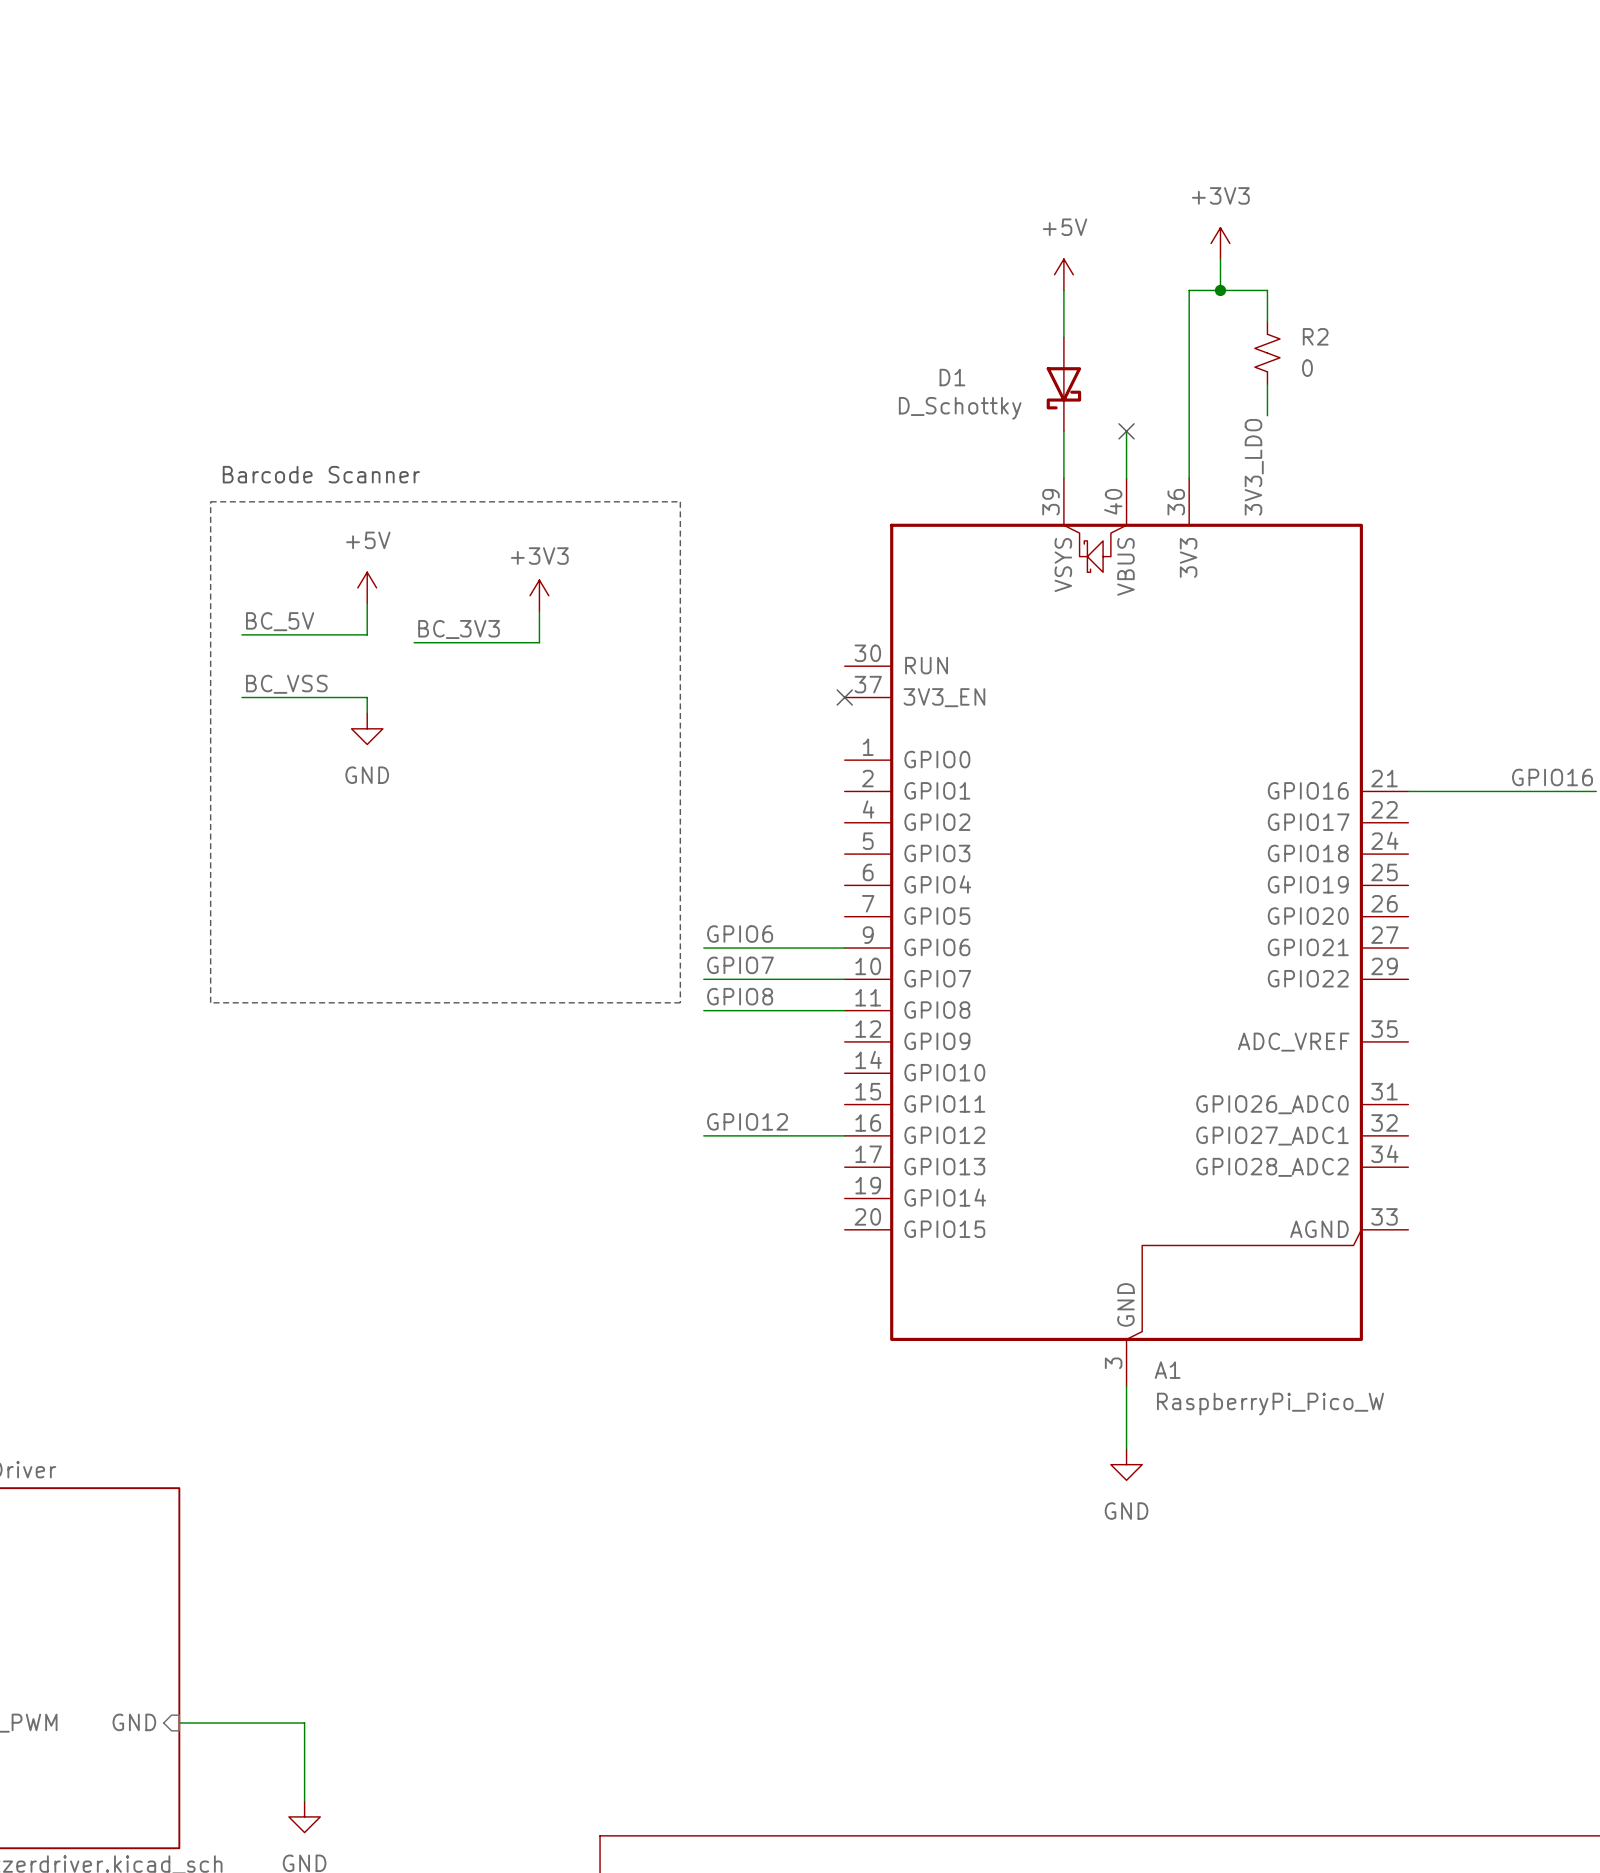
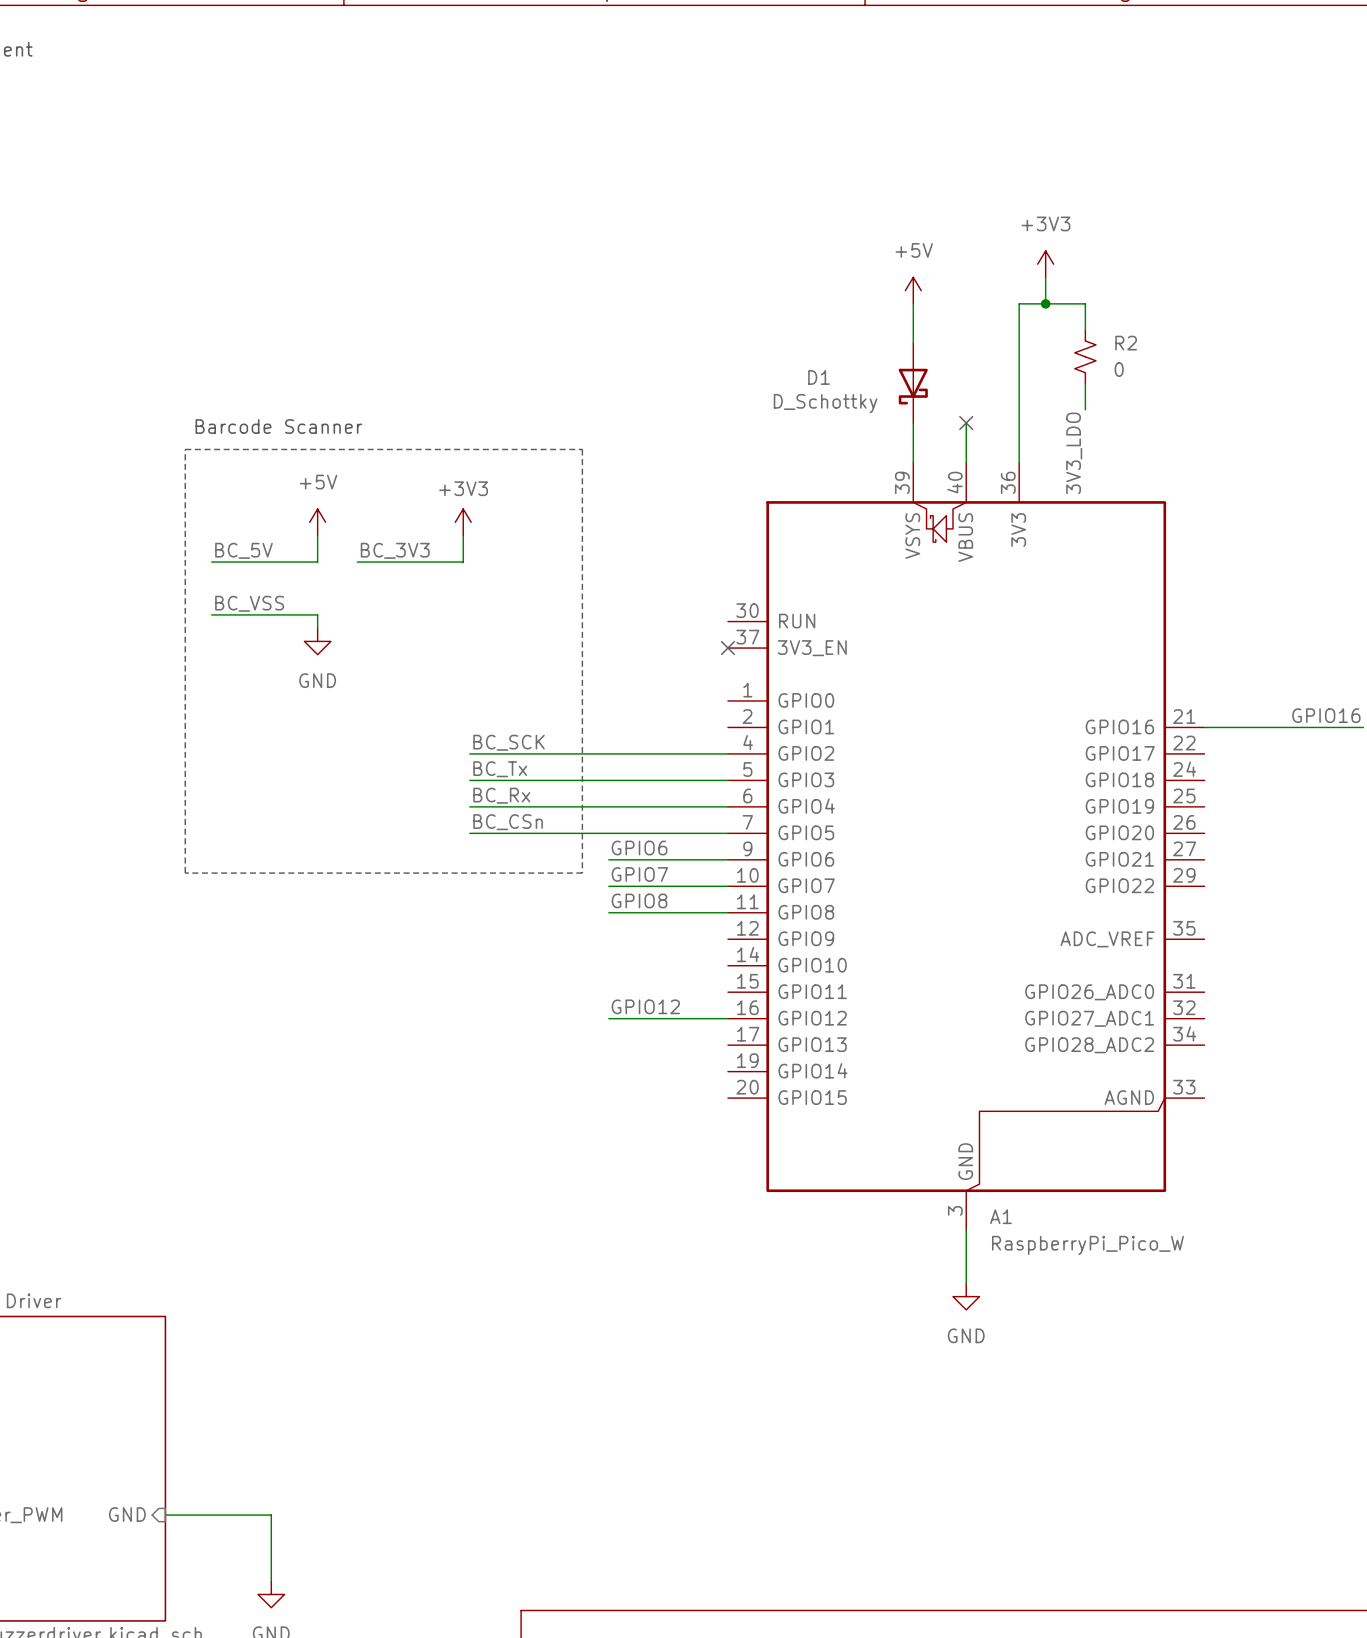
text position: Barcode Scanner (321, 474) -> Barcode Scanner (278, 426)
line: (210, 501) (680, 501) (680, 1002) (210, 1002) (210, 501) -> (185, 449) (582, 449) (582, 873) (185, 873) (185, 449)
power symbol position: +5V (367, 587) -> +5V (317, 522)
power symbol position: +3V3 (539, 595) -> +3V3 (463, 522)
wire: (367, 603) (367, 634) (241, 634) -> (317, 535) (317, 561) (211, 561)
wire: (539, 611) (539, 642) (414, 642) -> (463, 535) (463, 561) (357, 561)
label position: BC_5V (280, 621) -> BC_5V (243, 550)
label position: BC_3V3 (459, 629) -> BC_3V3 (395, 550)
label position: BC_VSS (286, 684) -> BC_VSS (249, 603)
wire: (241, 697) (367, 697) (367, 713) -> (211, 614) (317, 614) (317, 628)
power symbol position: GND (367, 728) -> GND (317, 641)
label: none -> BC_SCK (509, 742)
wire: none -> (469, 753) (727, 753)
label: none -> BC_Tx (500, 769)
wire: none -> (469, 780) (727, 780)
label: none -> BC_Rx (501, 795)
wire: none -> (469, 806) (727, 806)
label: none -> BC_CSn (508, 822)
wire: none -> (469, 833) (727, 833)

